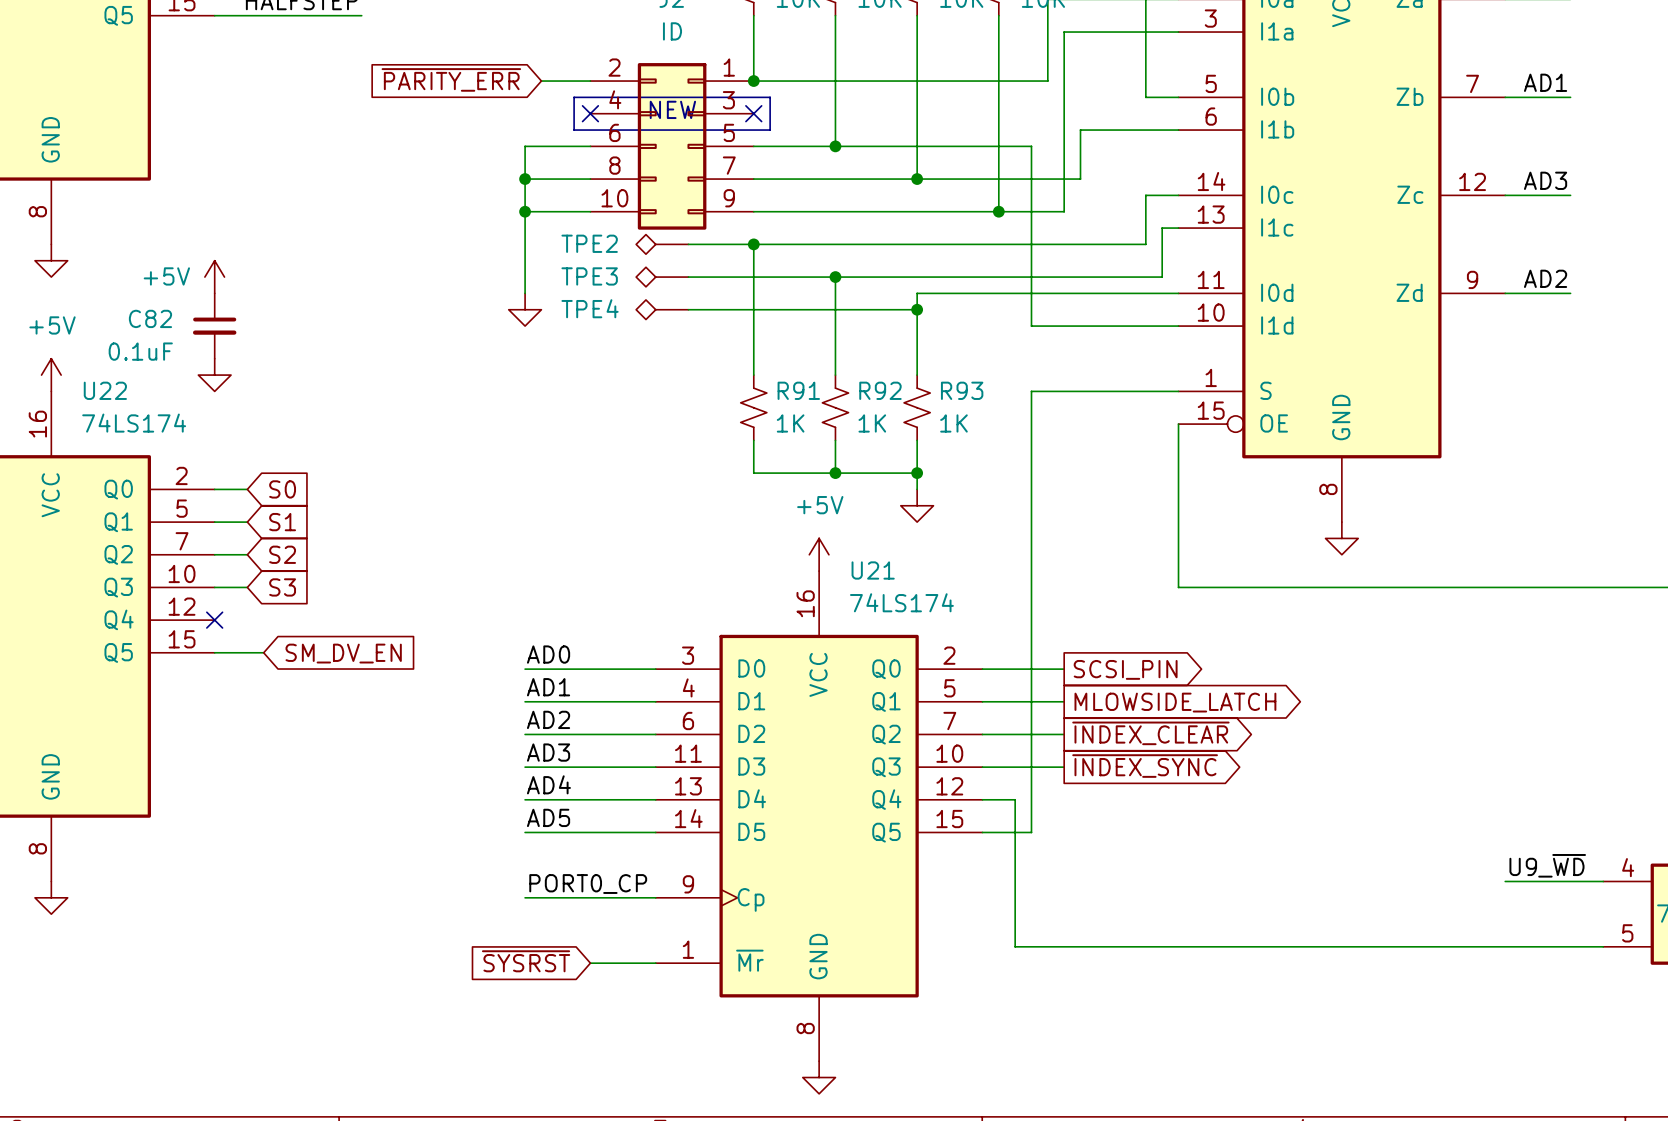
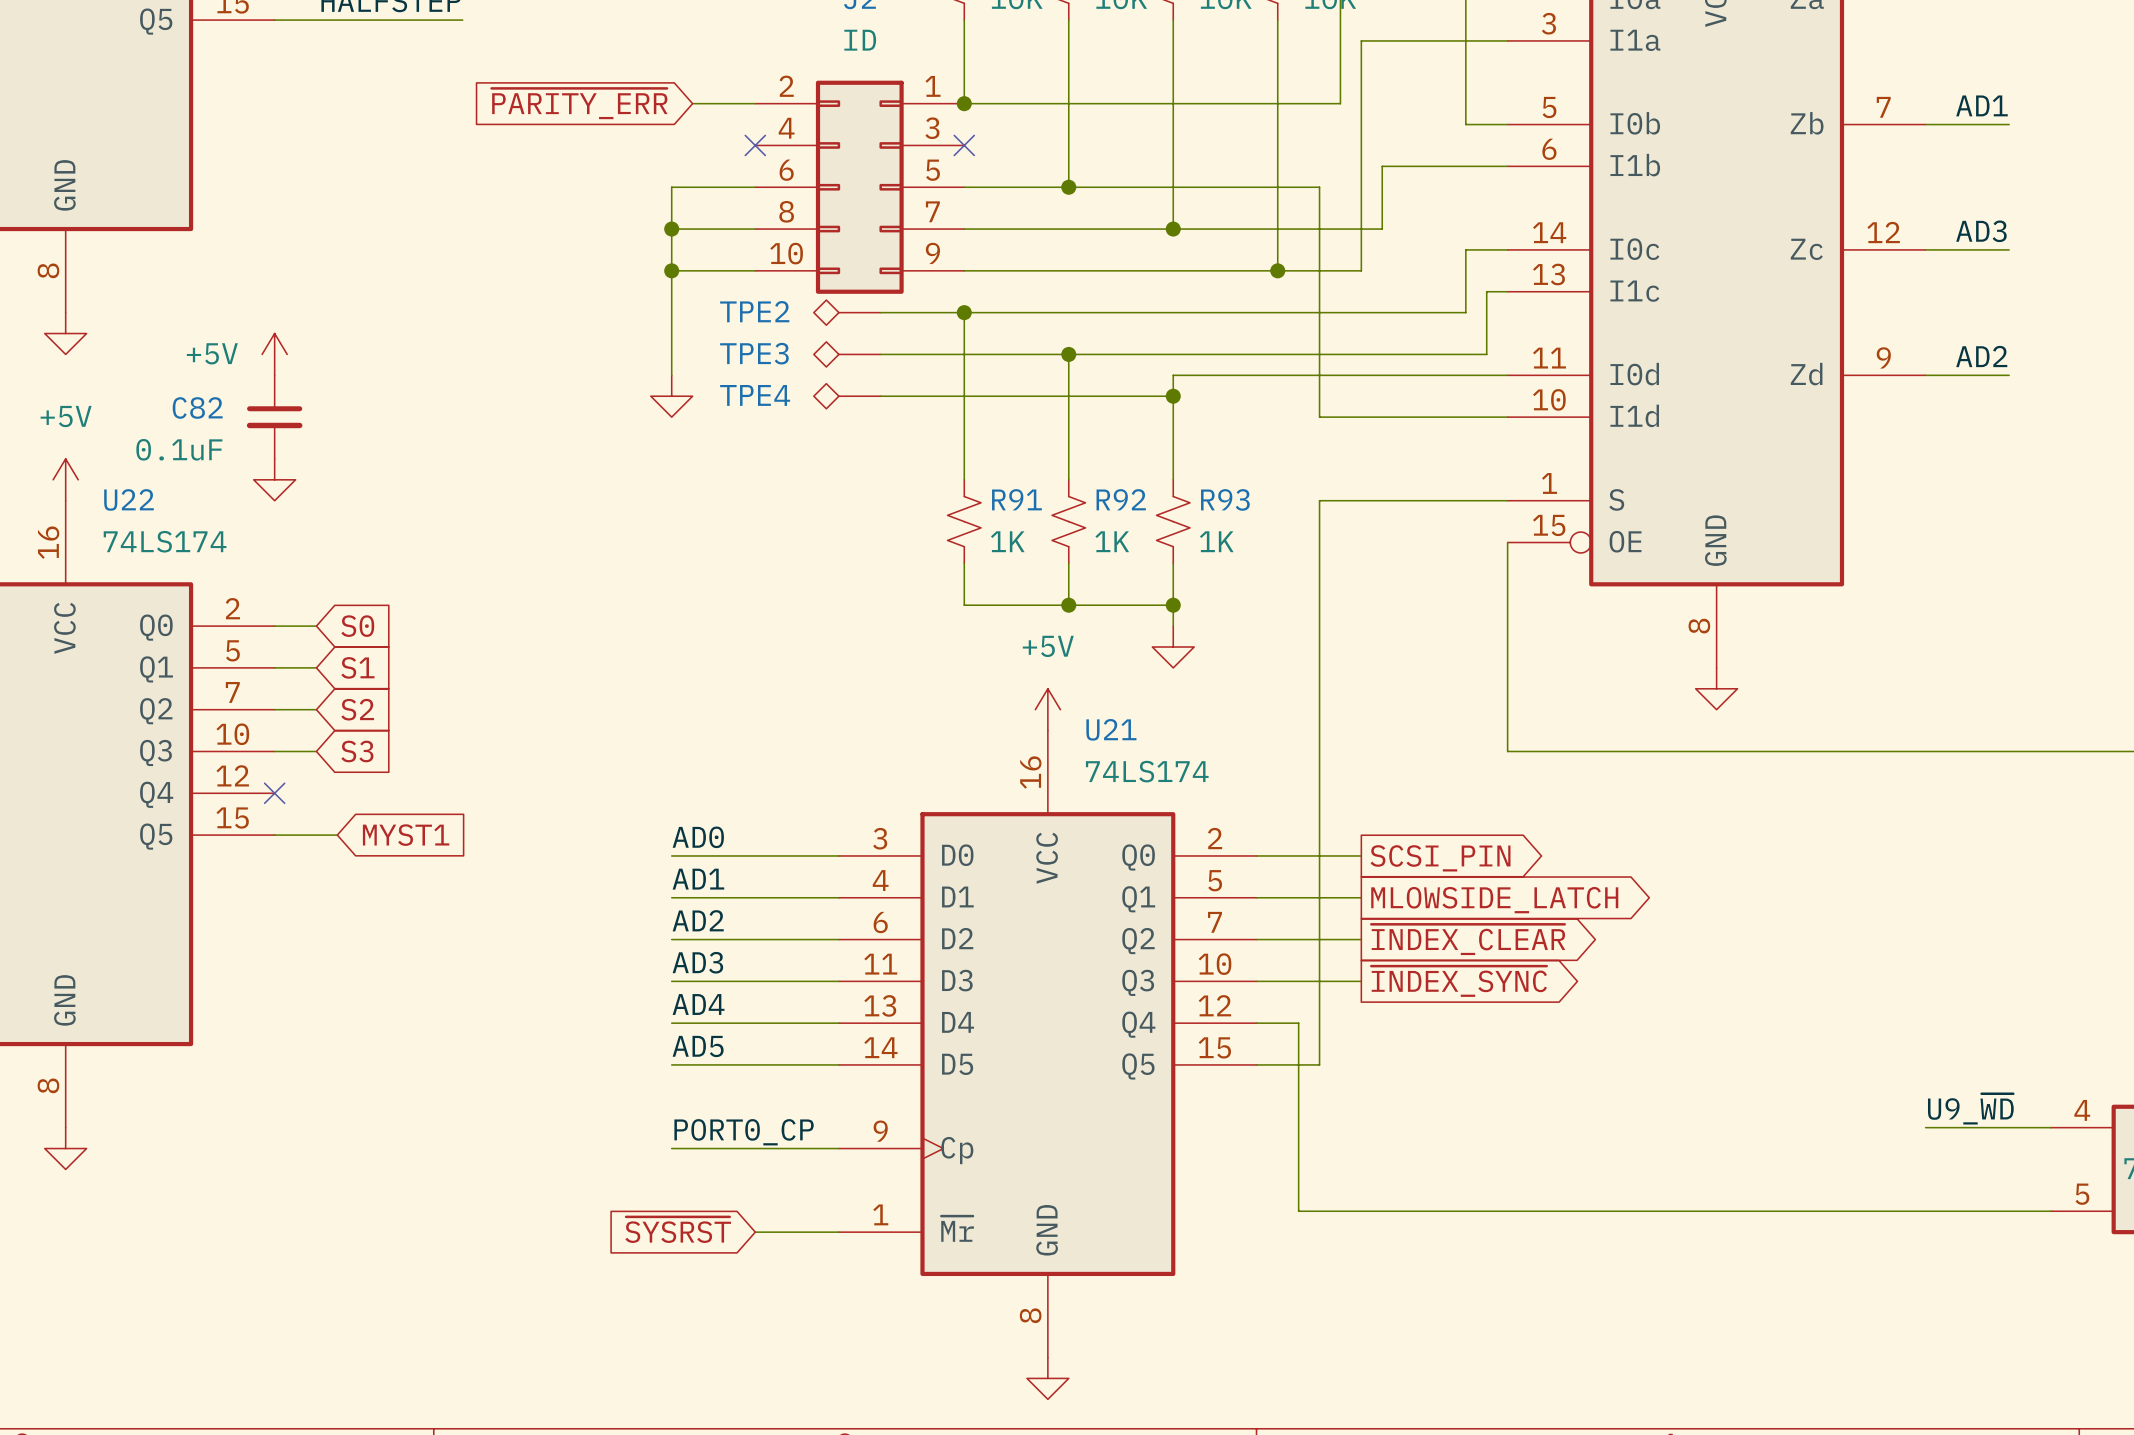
line: (574, 97) (770, 97) (770, 130) (574, 130) (574, 97) -> none
text: NEW (672, 109) -> none
global label: SM_DV_EN (343, 653) -> MYST1 (406, 835)

